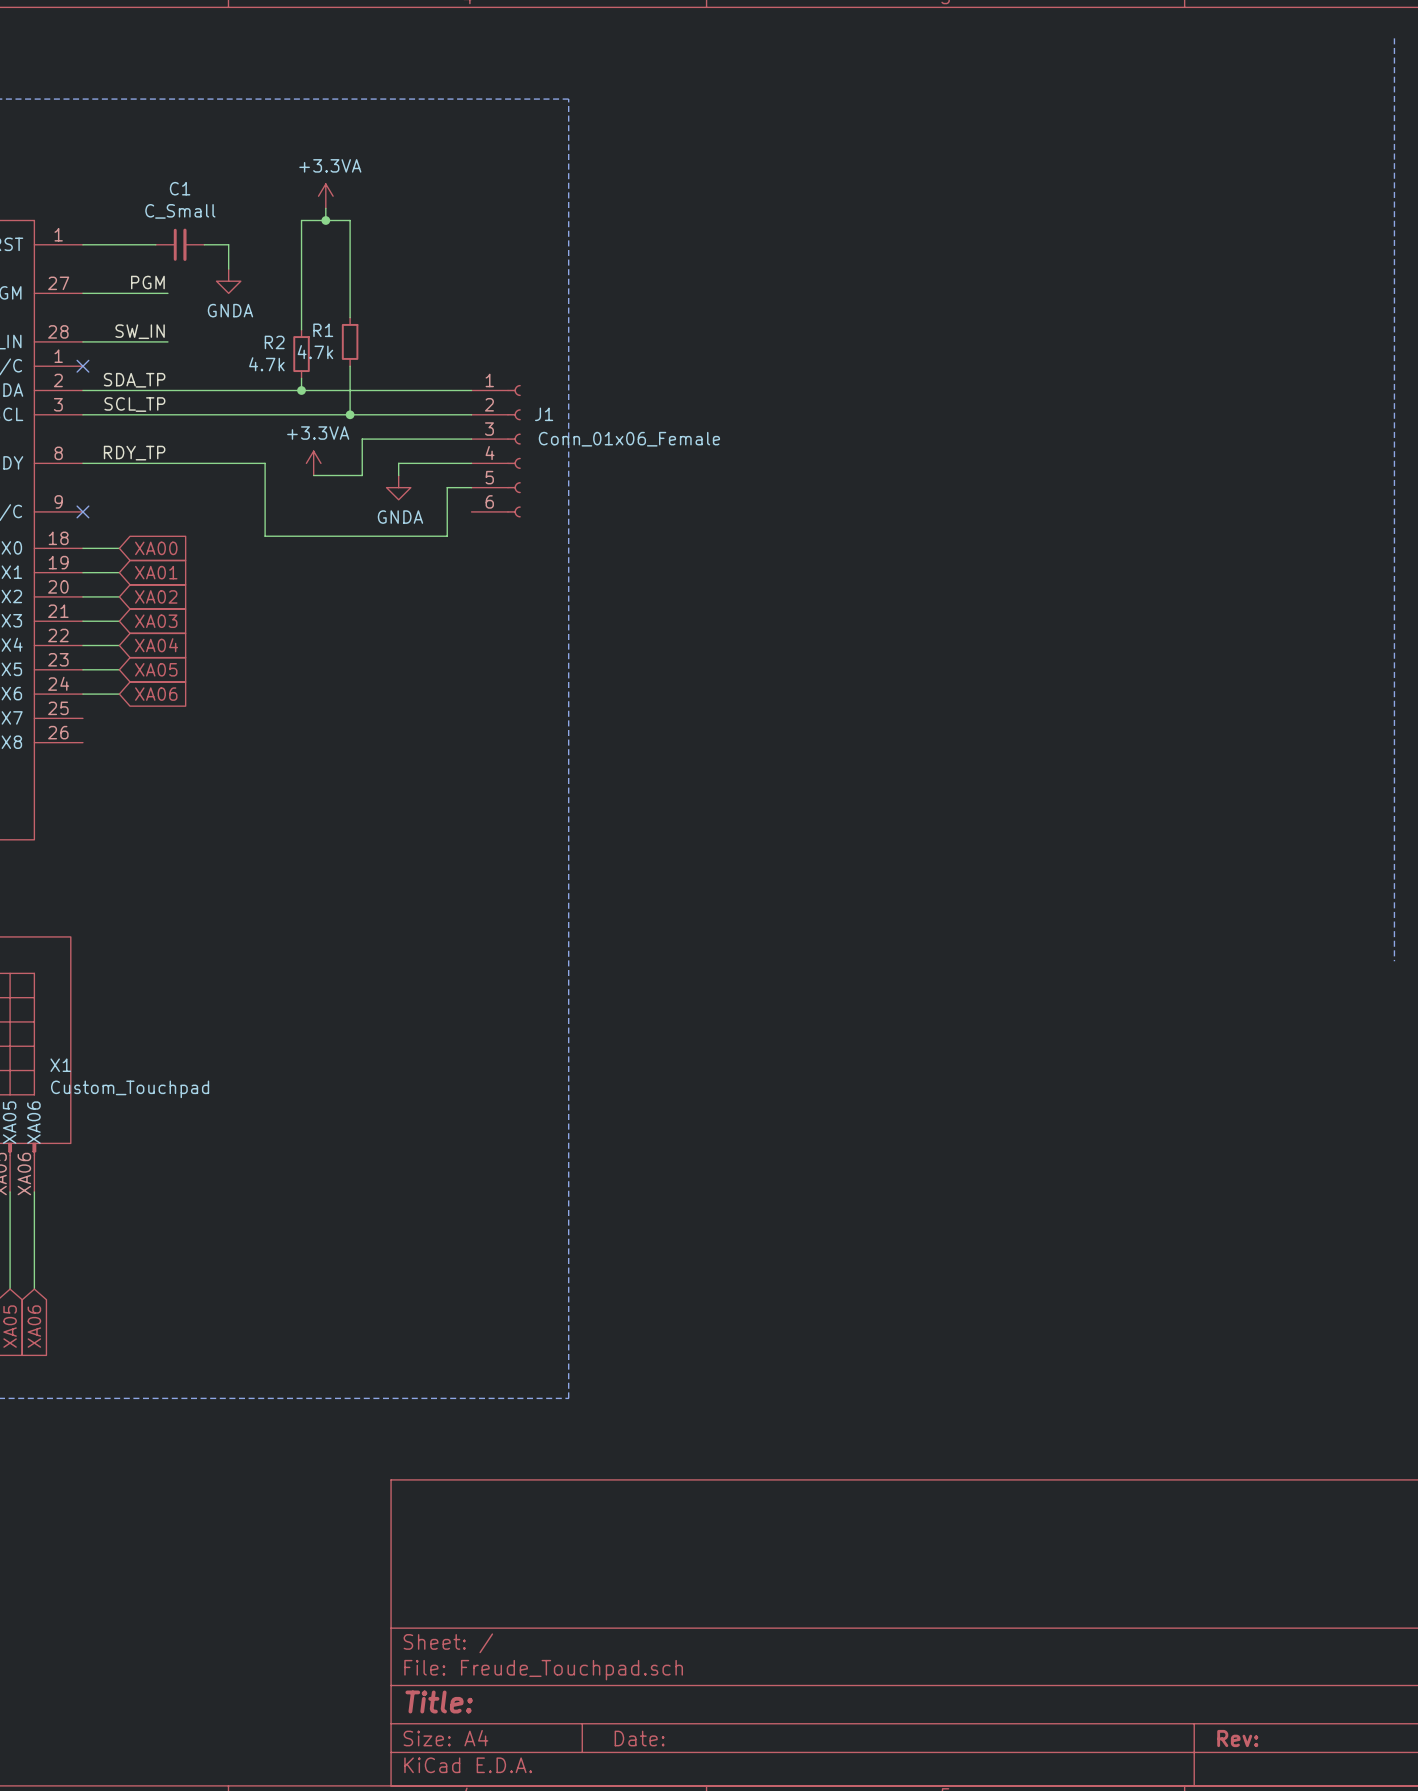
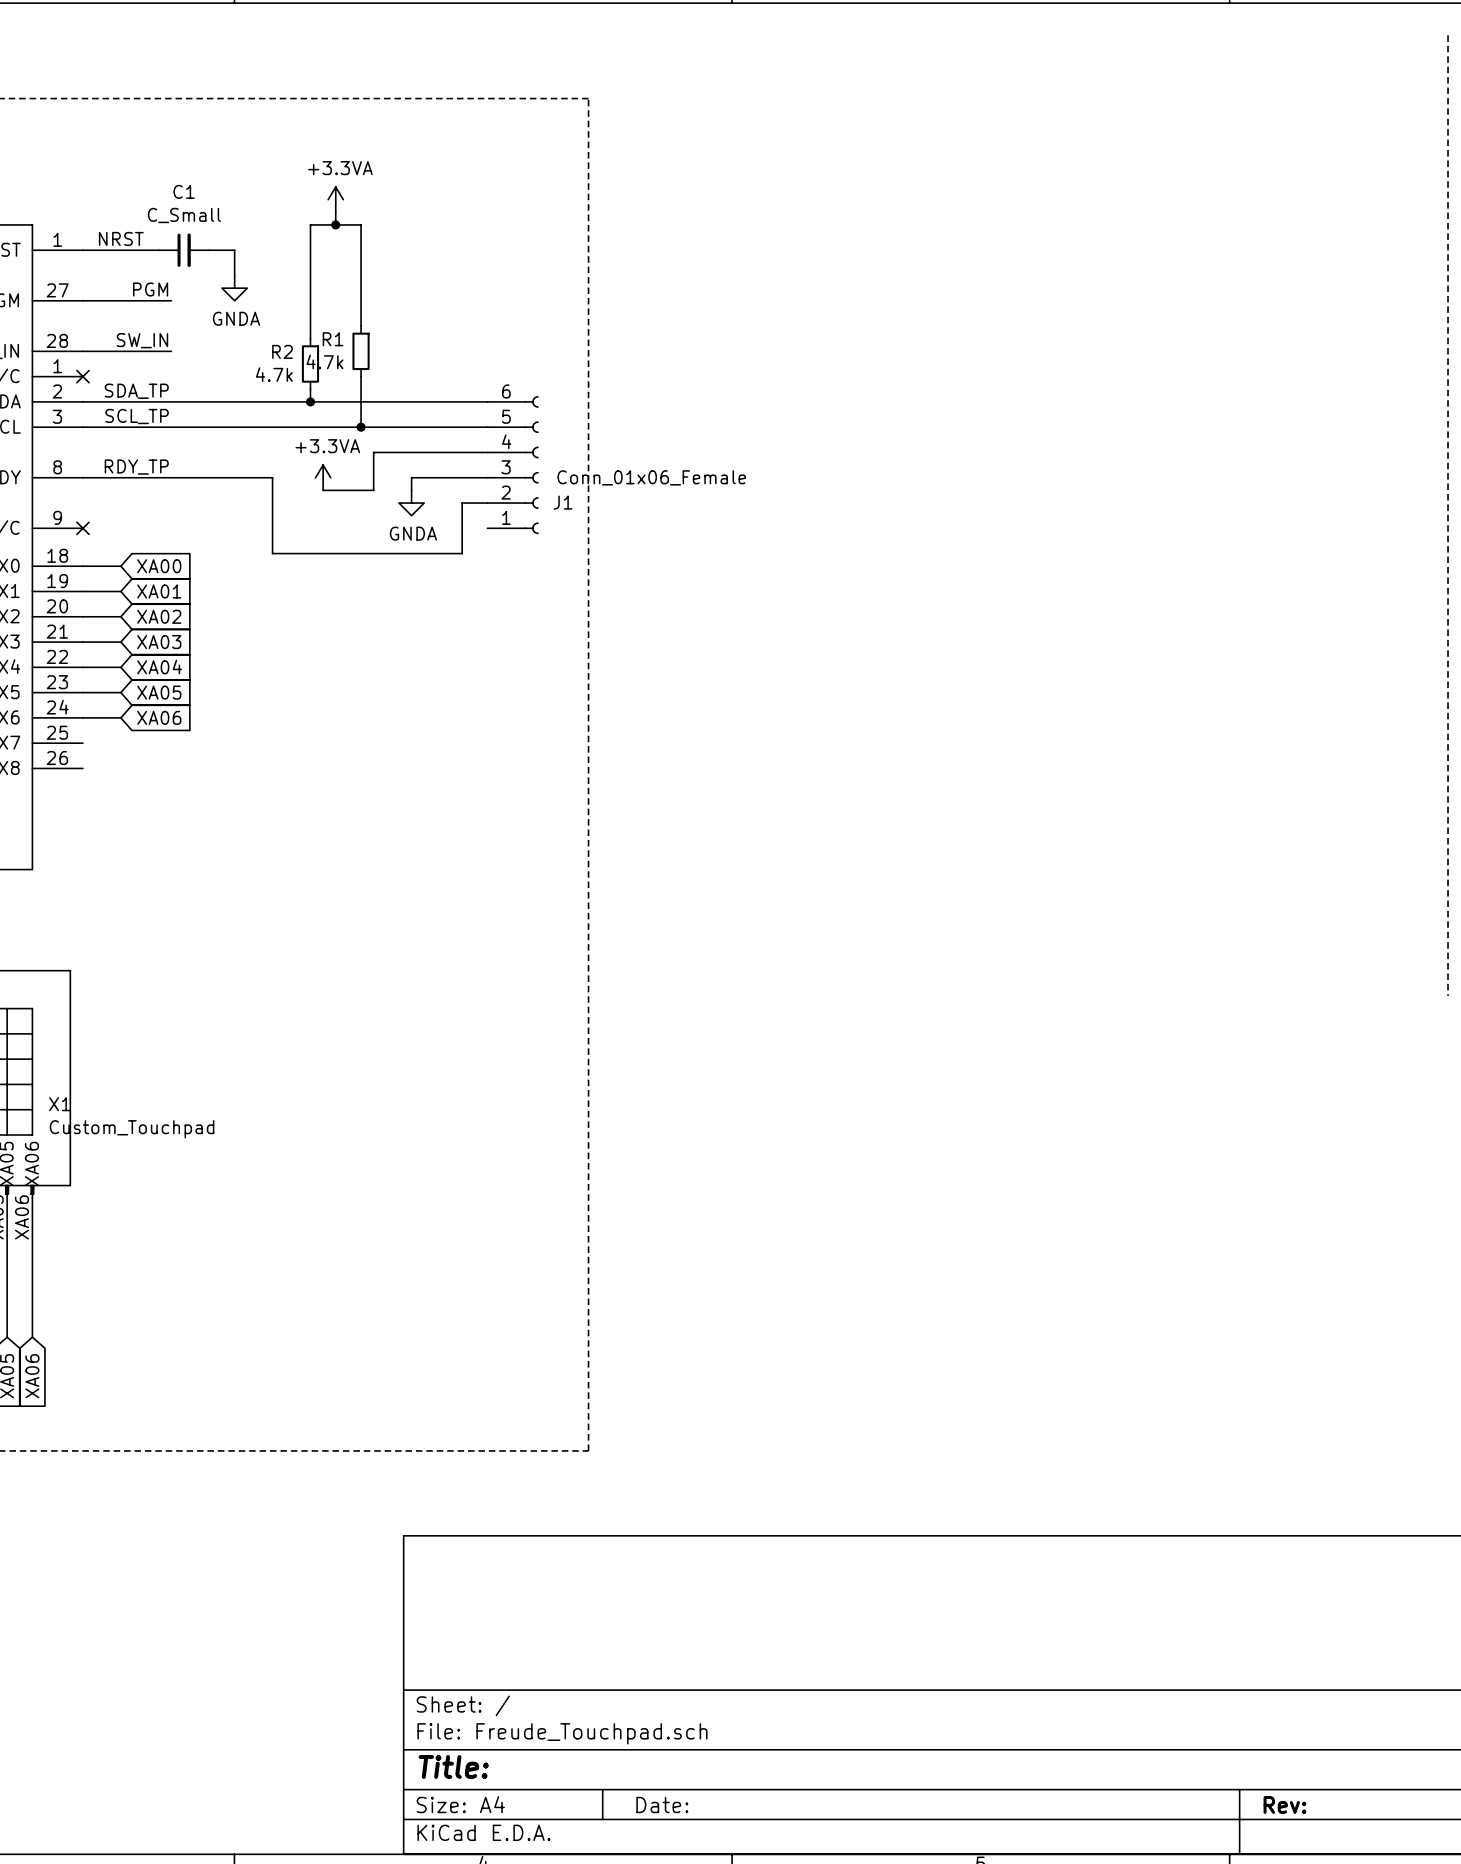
label: none -> NRST (121, 238)
J1 flip: as is (514, 451) -> up-down (531, 465)

